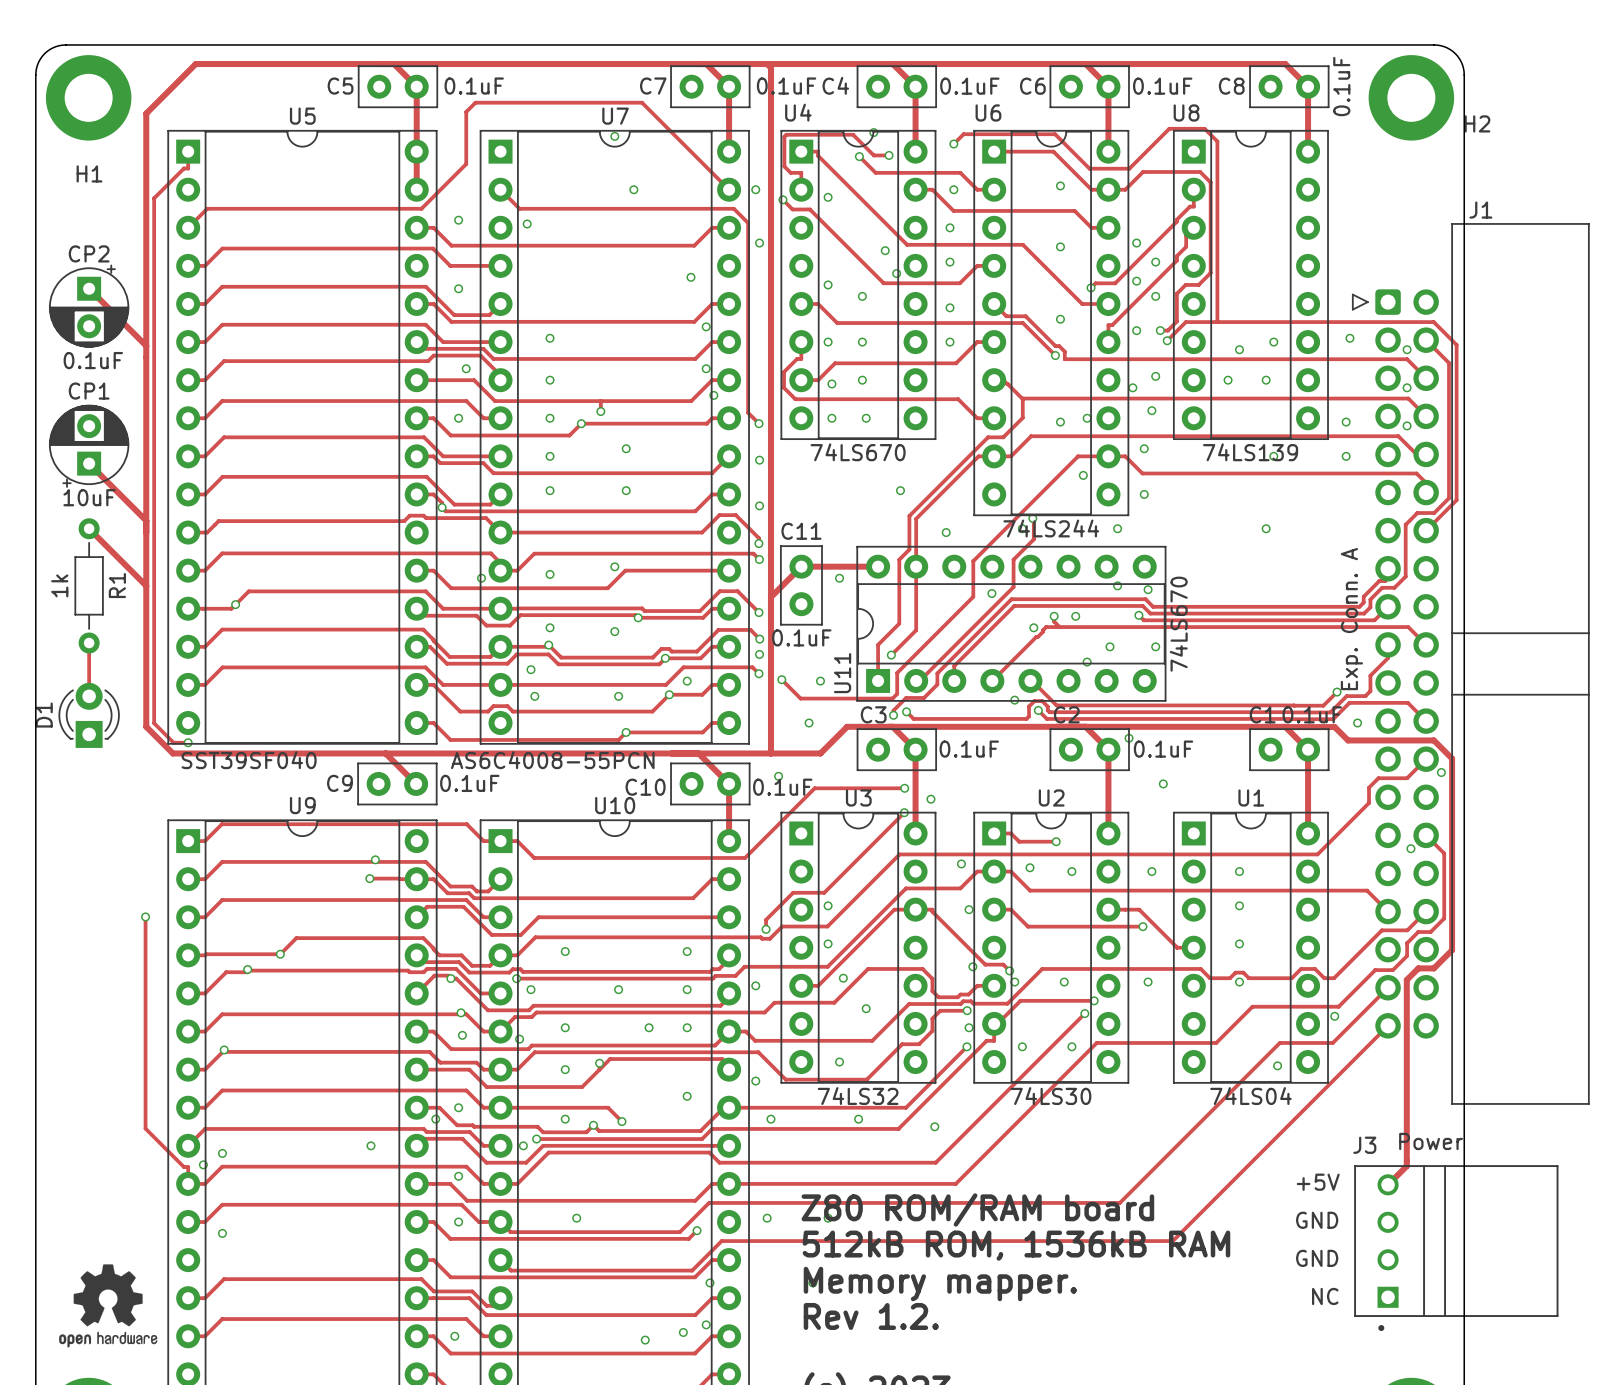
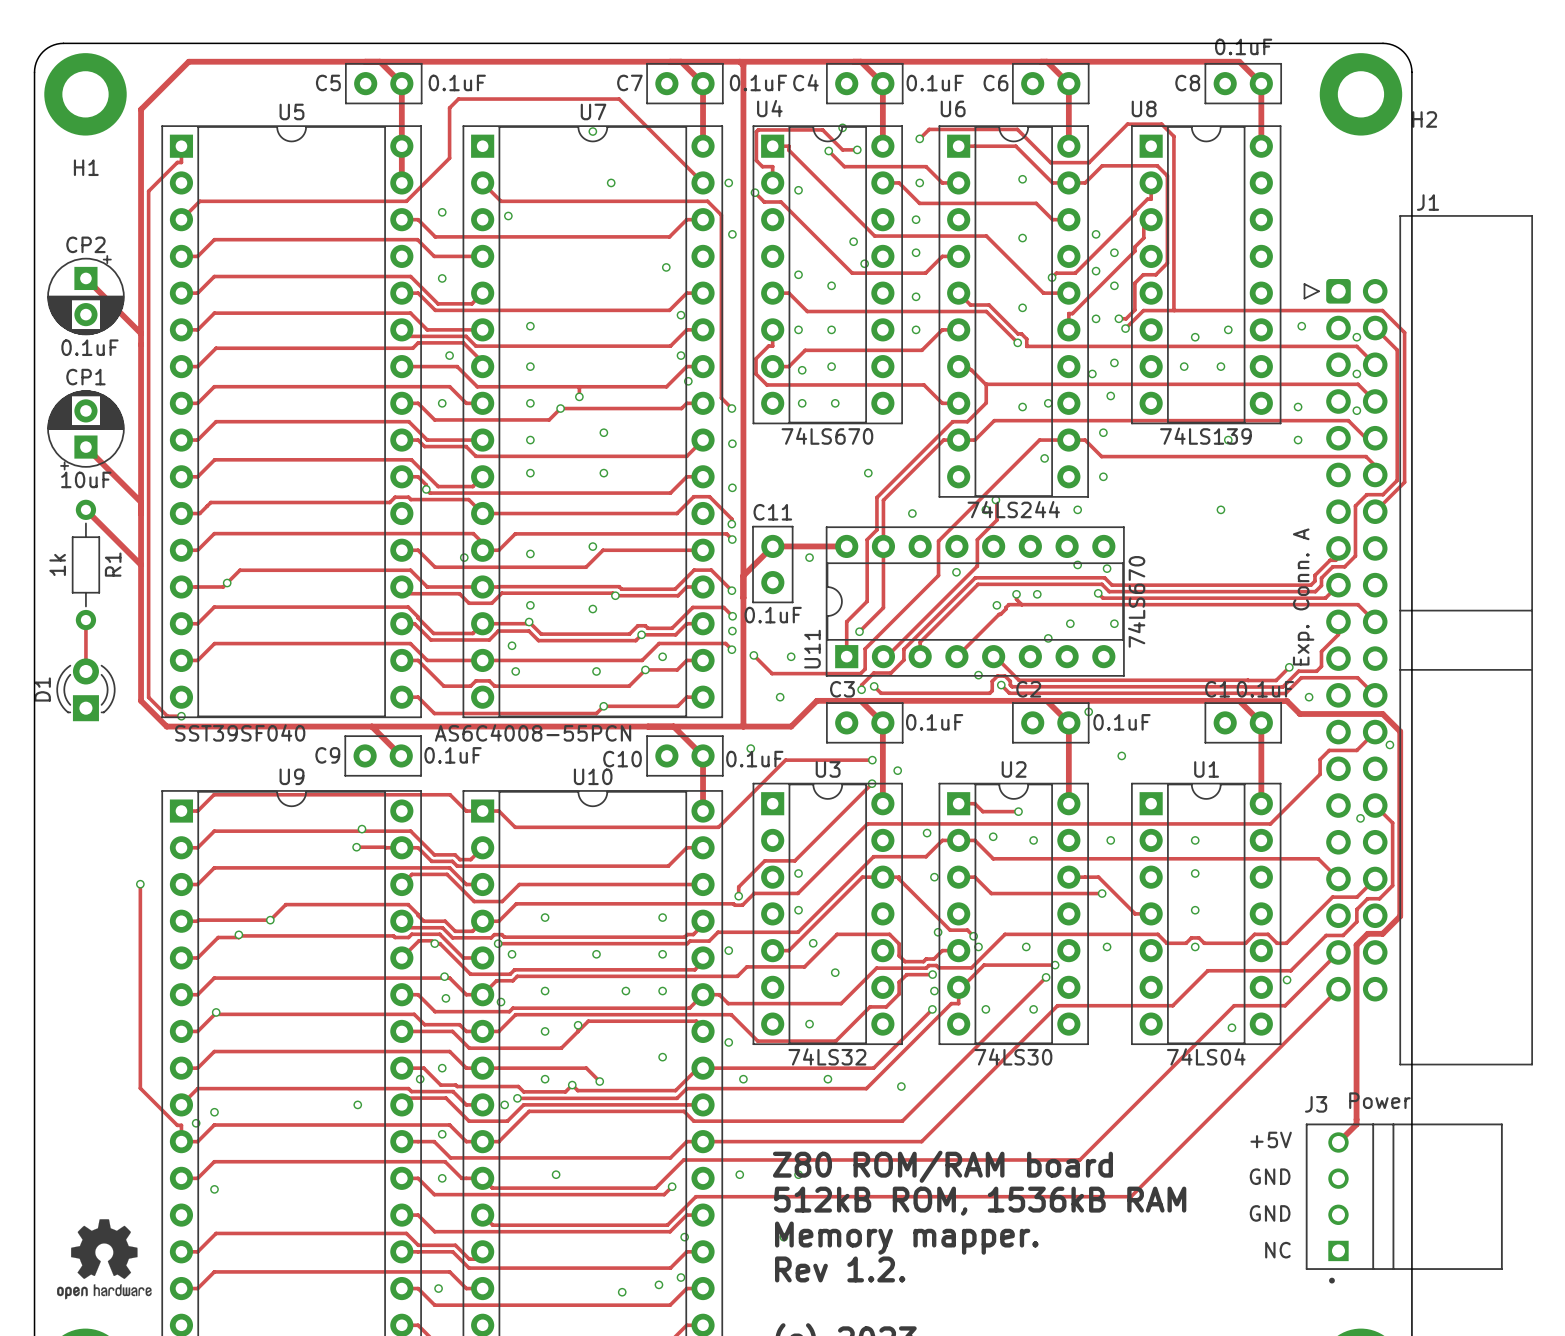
C6 value: 0.1uF (1162, 86) -> none
C8 value rotation: 0° (1341, 86) -> 90° clockwise (1243, 46)

